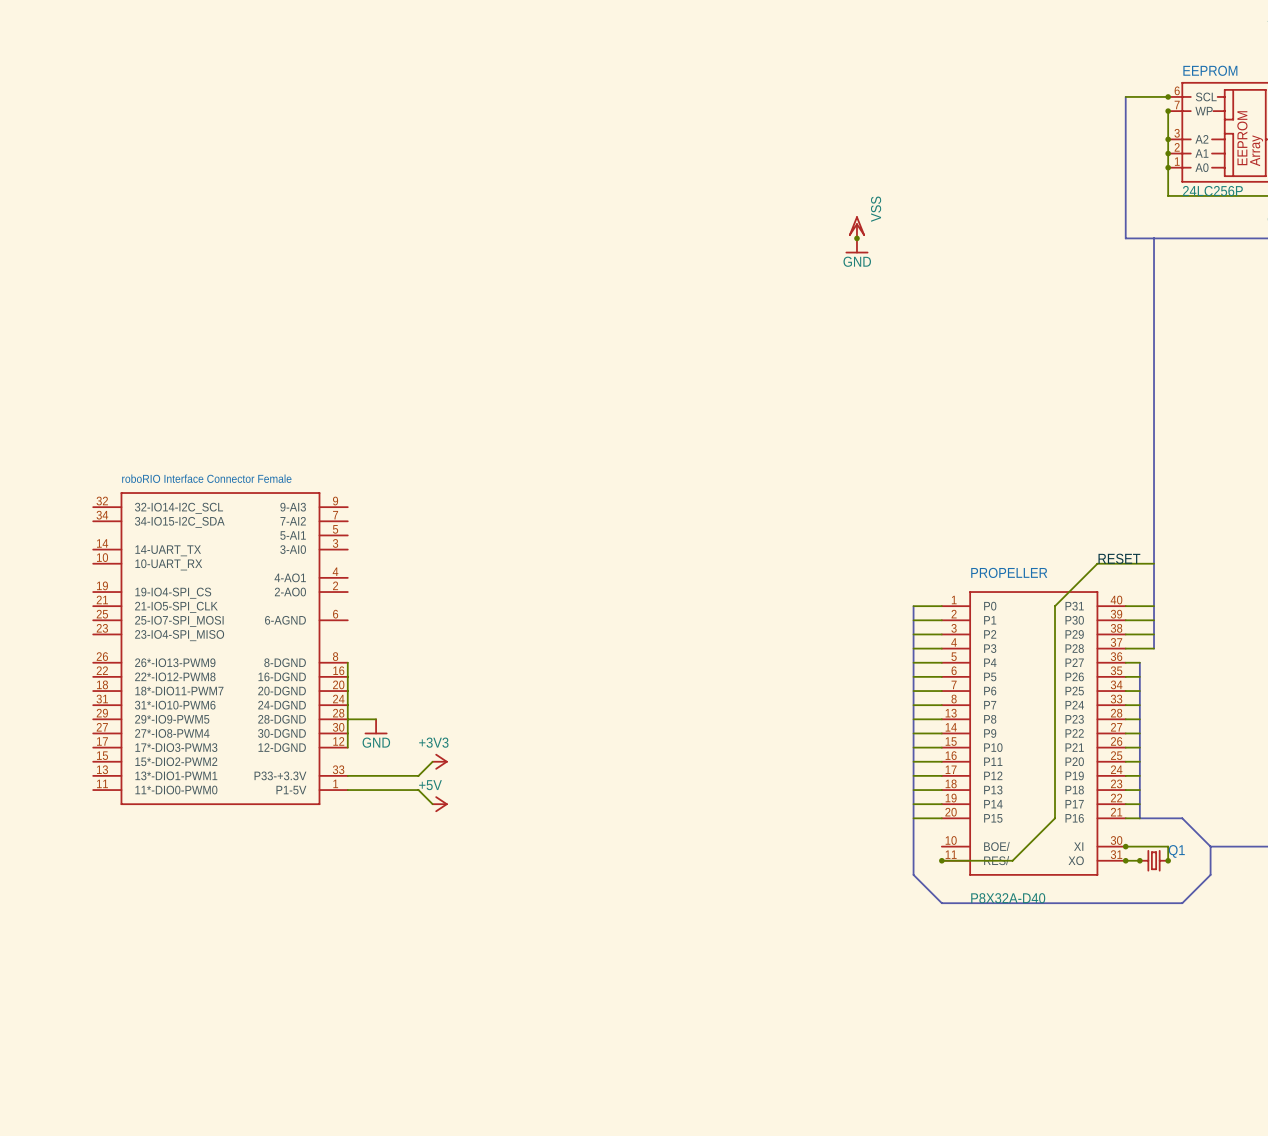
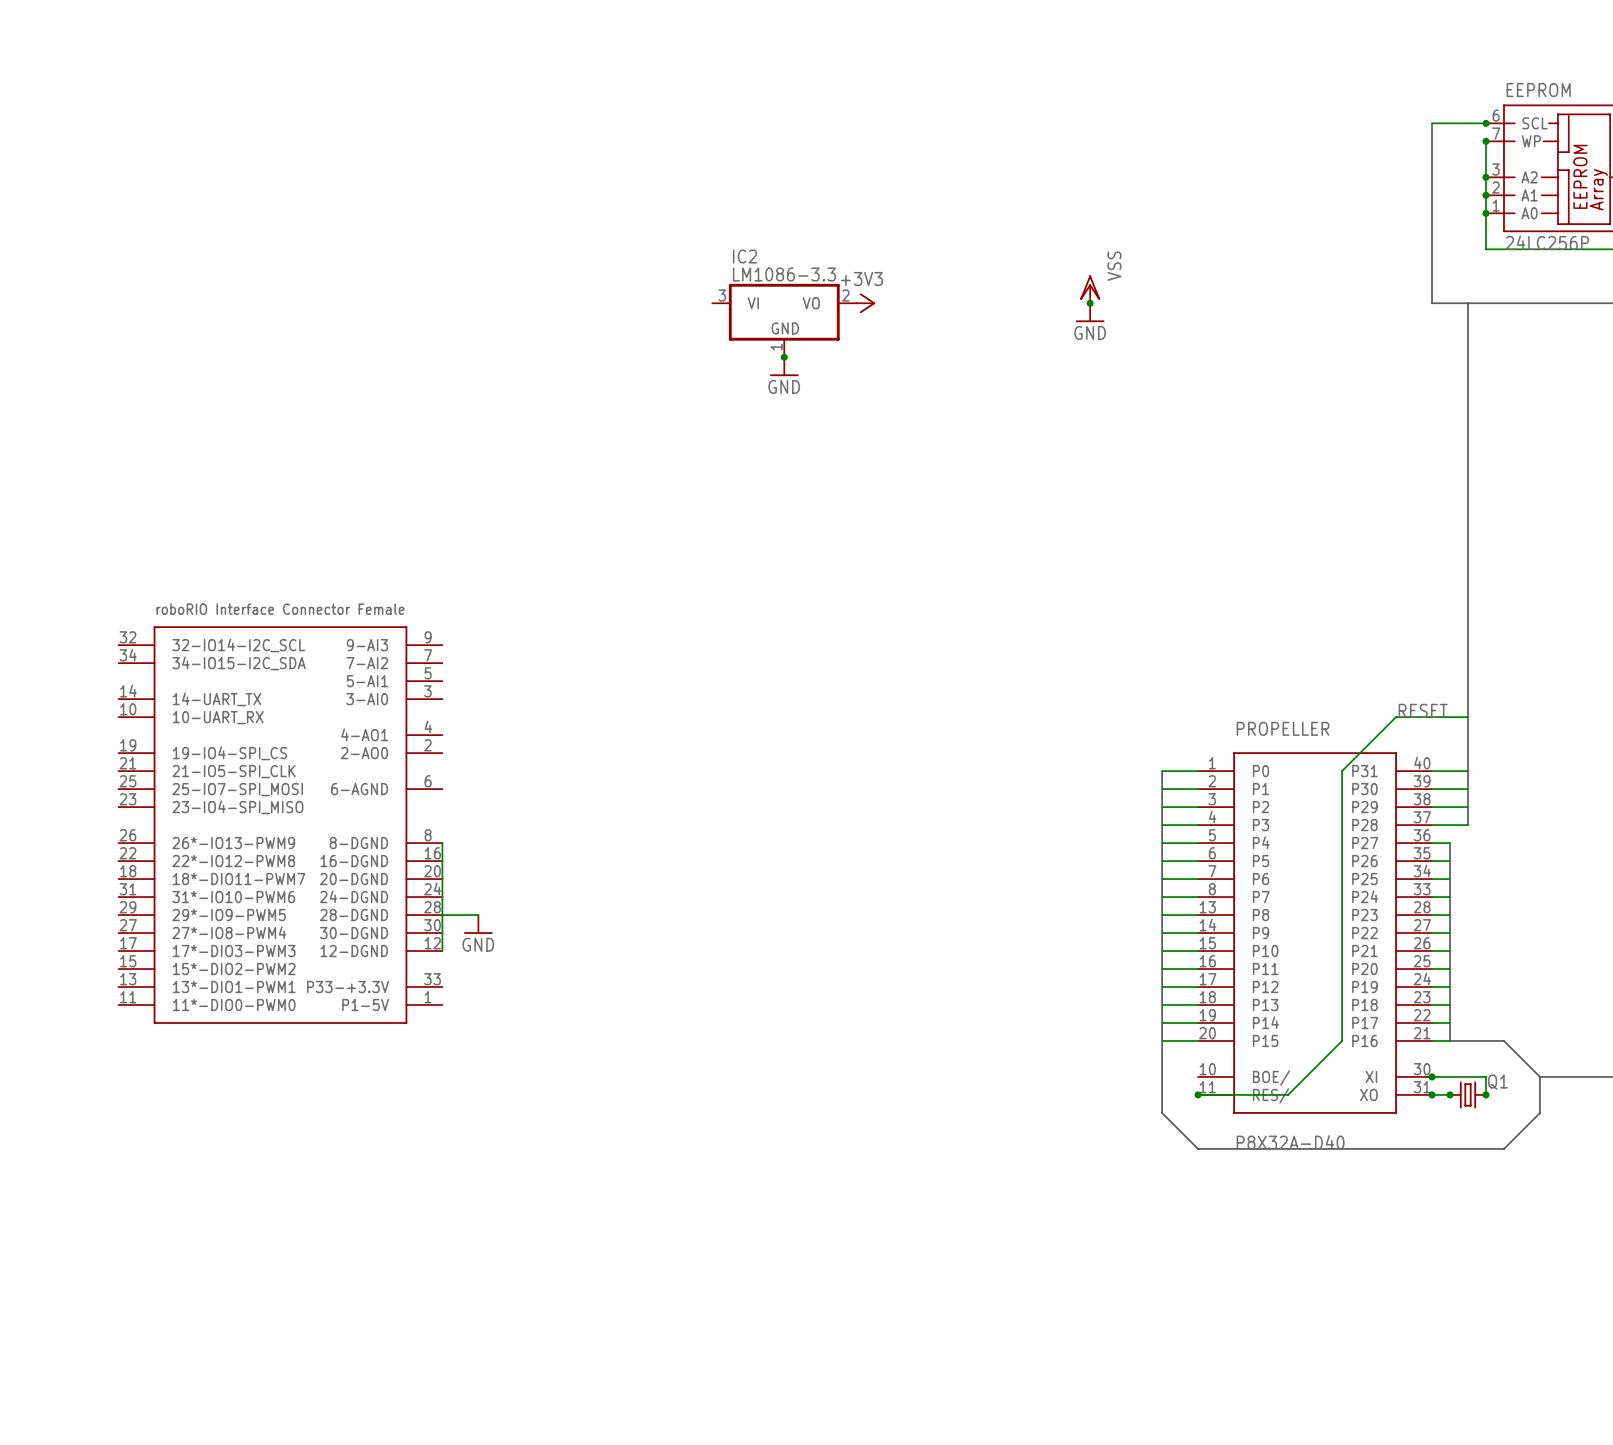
power symbol: none -> +3V3 (865, 303)
IC2: none -> LM1086-3.3 (784, 320)
junction: none -> (784, 357)
power symbol: none -> GND (784, 366)
wire: (432, 761) (418, 775) (347, 775) -> none
power symbol: +3V3 (440, 761) -> none
wire: (347, 790) (418, 790) (432, 804) -> none
power symbol: +5V (440, 804) -> none

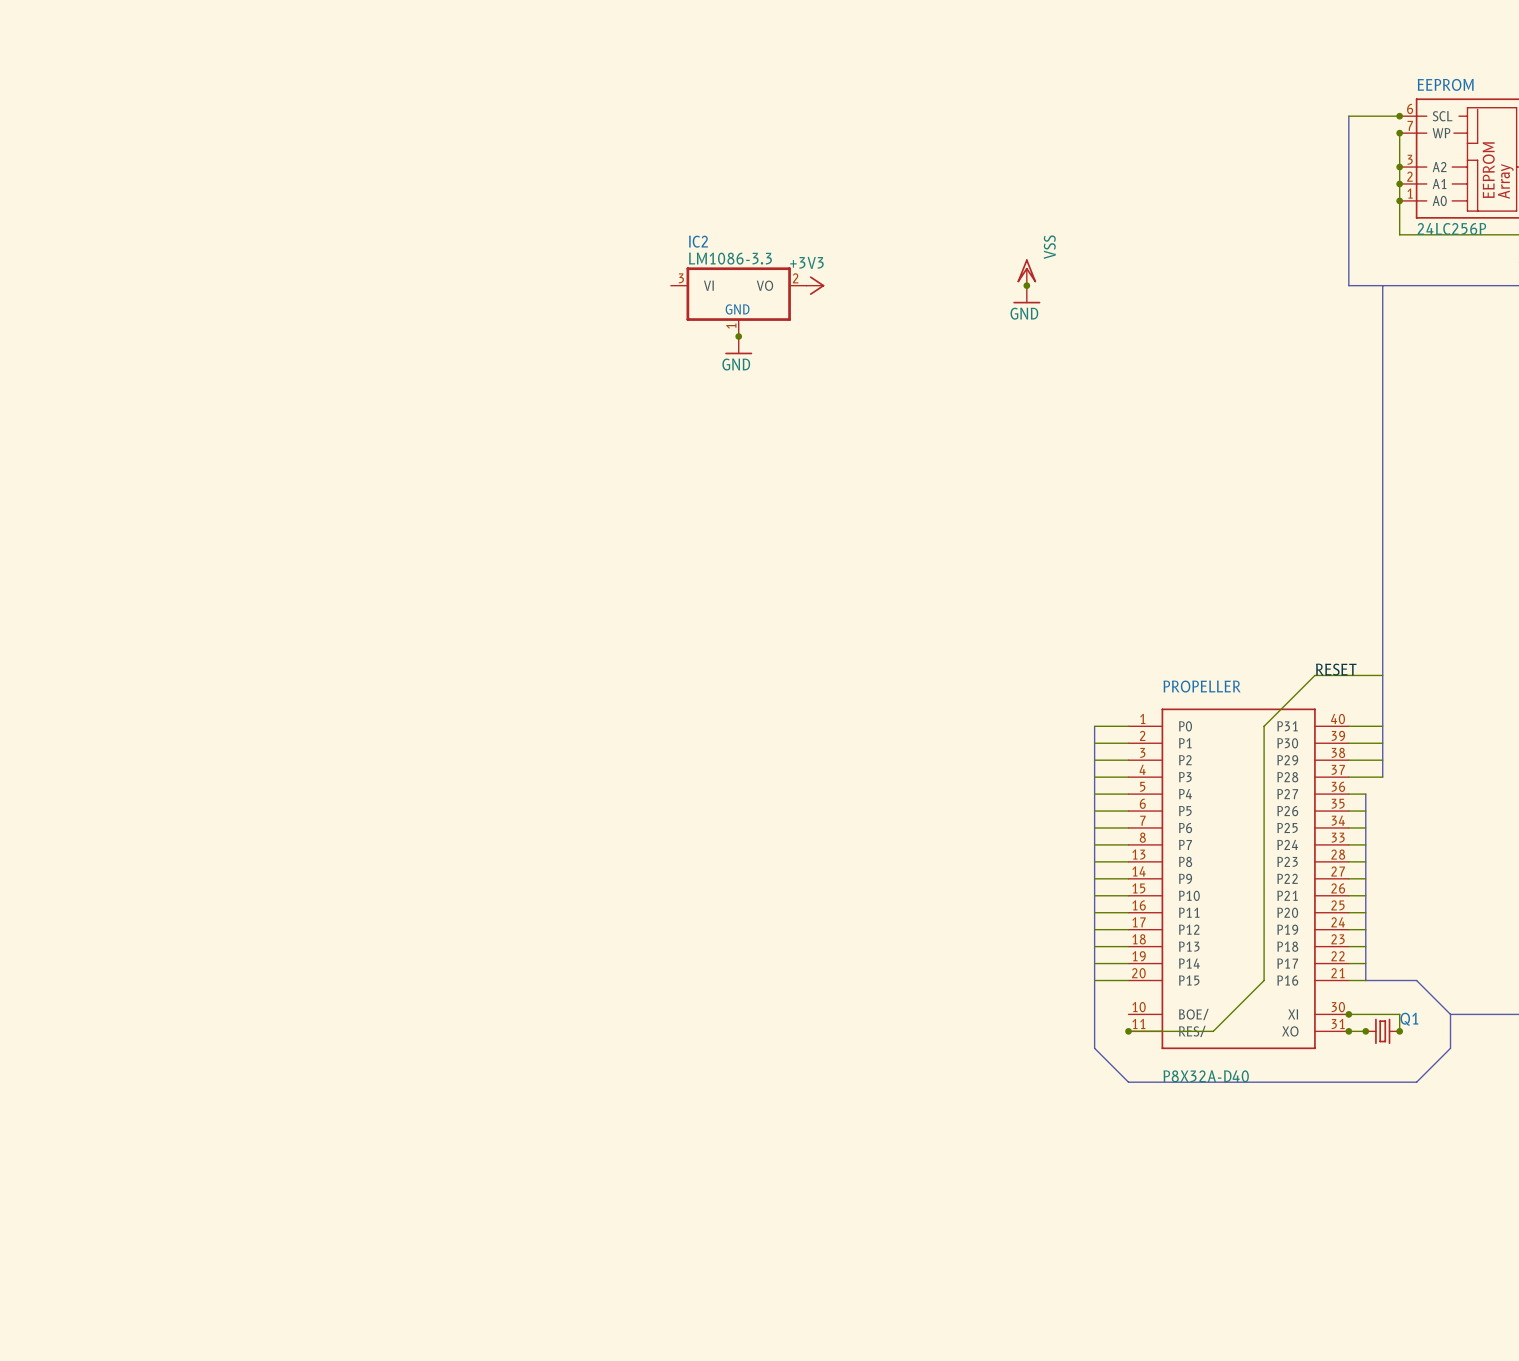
part: (280, 825) -> none
wire: (442, 843) (442, 951) -> none
wire: (442, 915) (478, 915) -> none
power symbol: GND (478, 924) -> none

